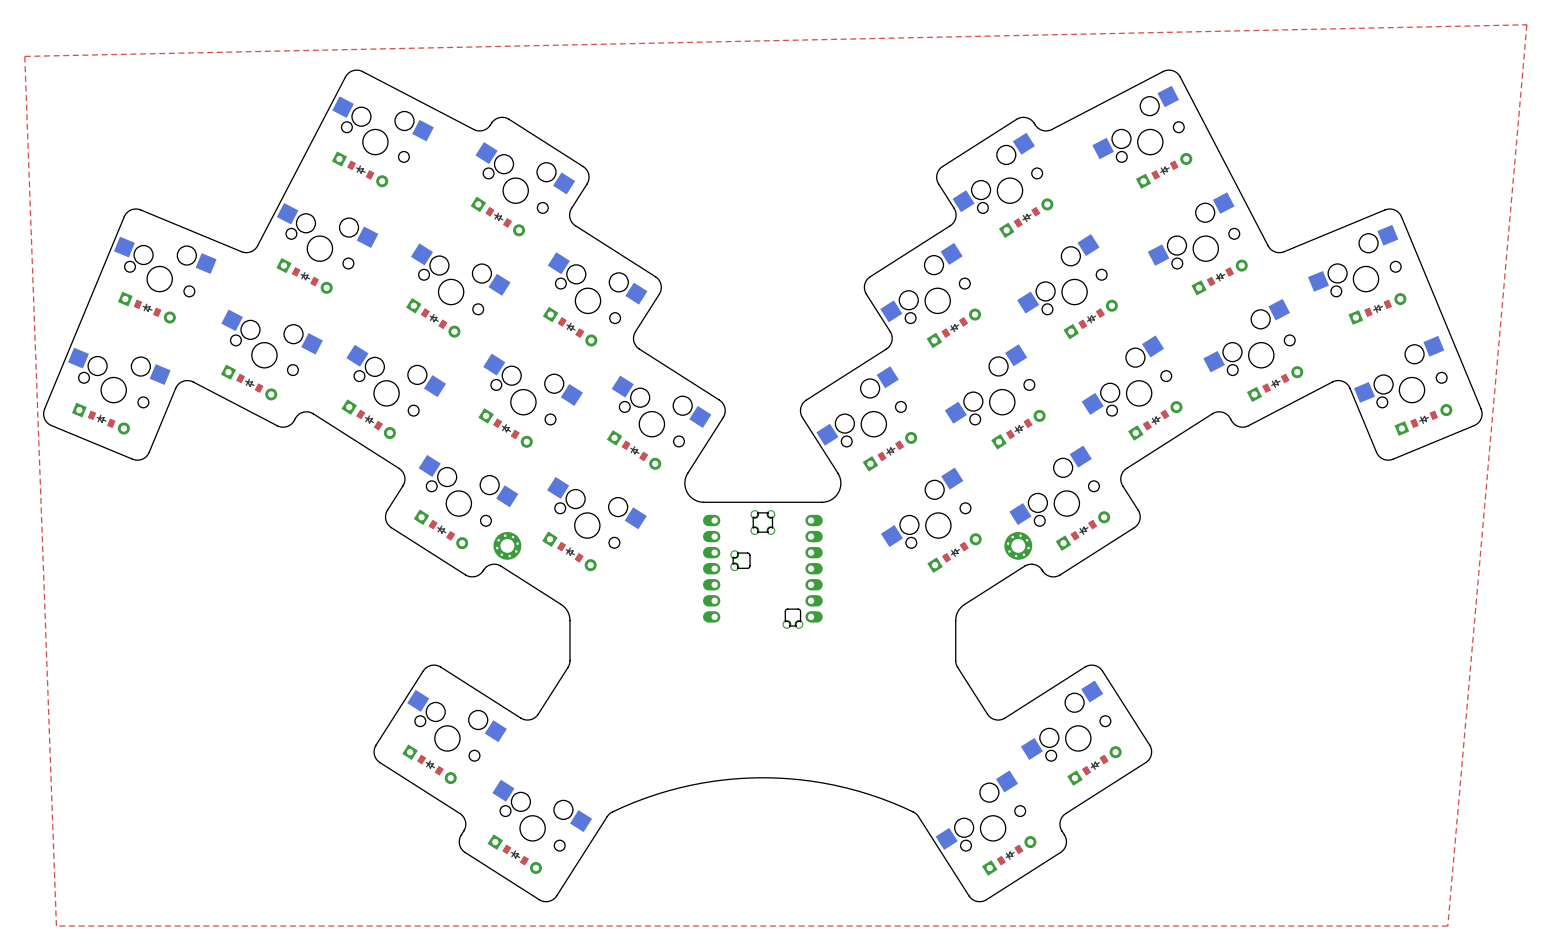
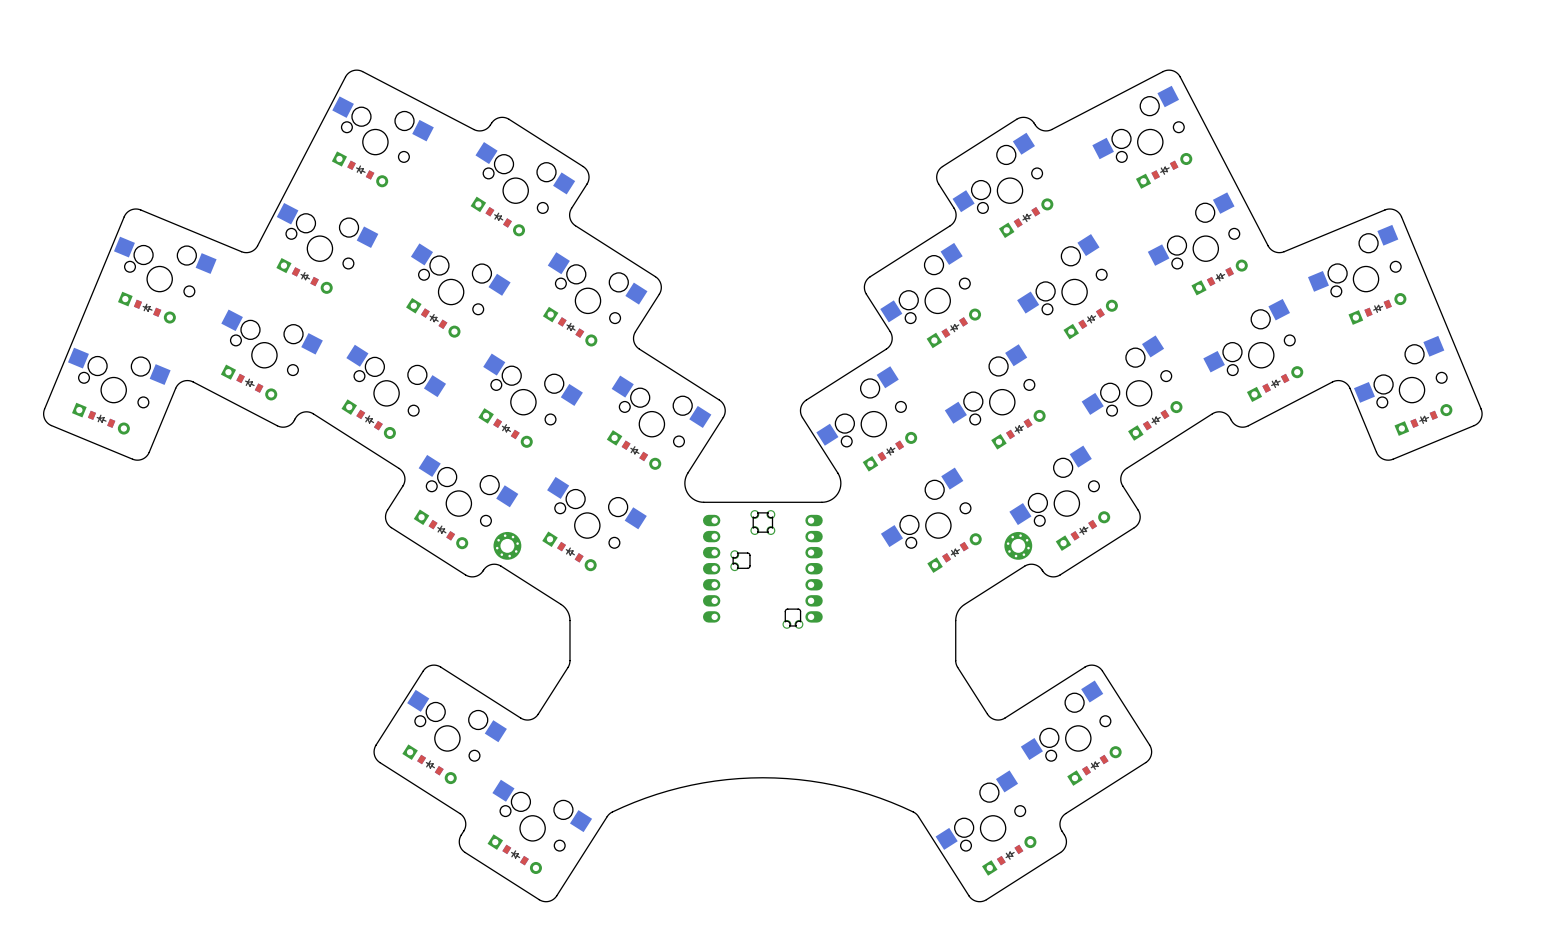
top zone outline: (1526, 24) (1447, 926) (56, 926) (24, 56) (1526, 24) -> none

